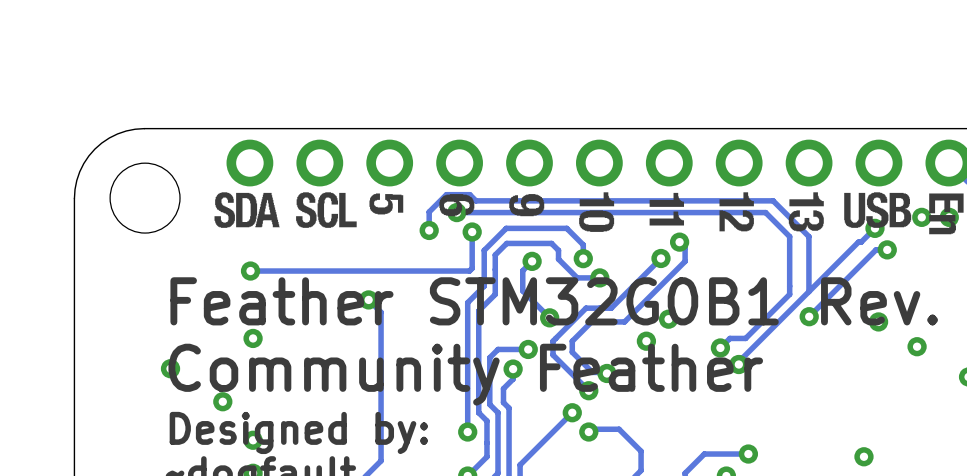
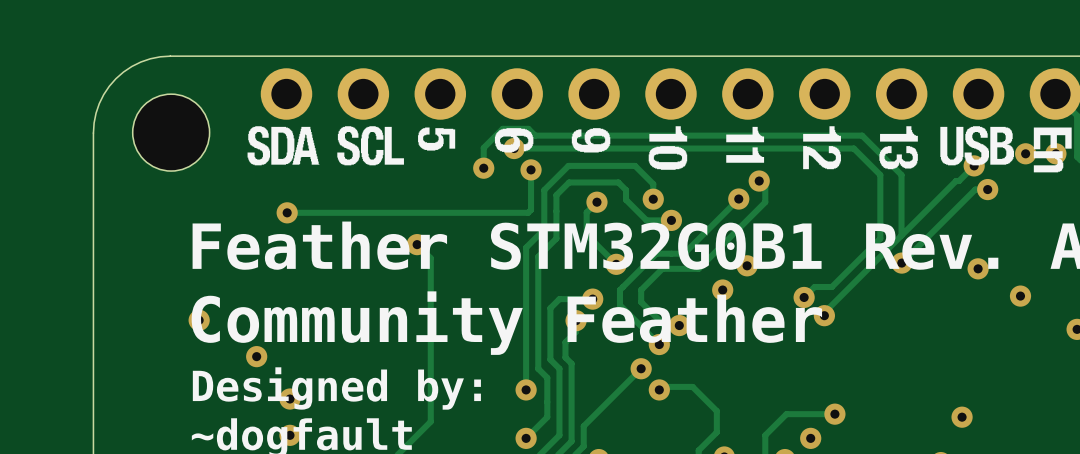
via: (253, 338) -> none

